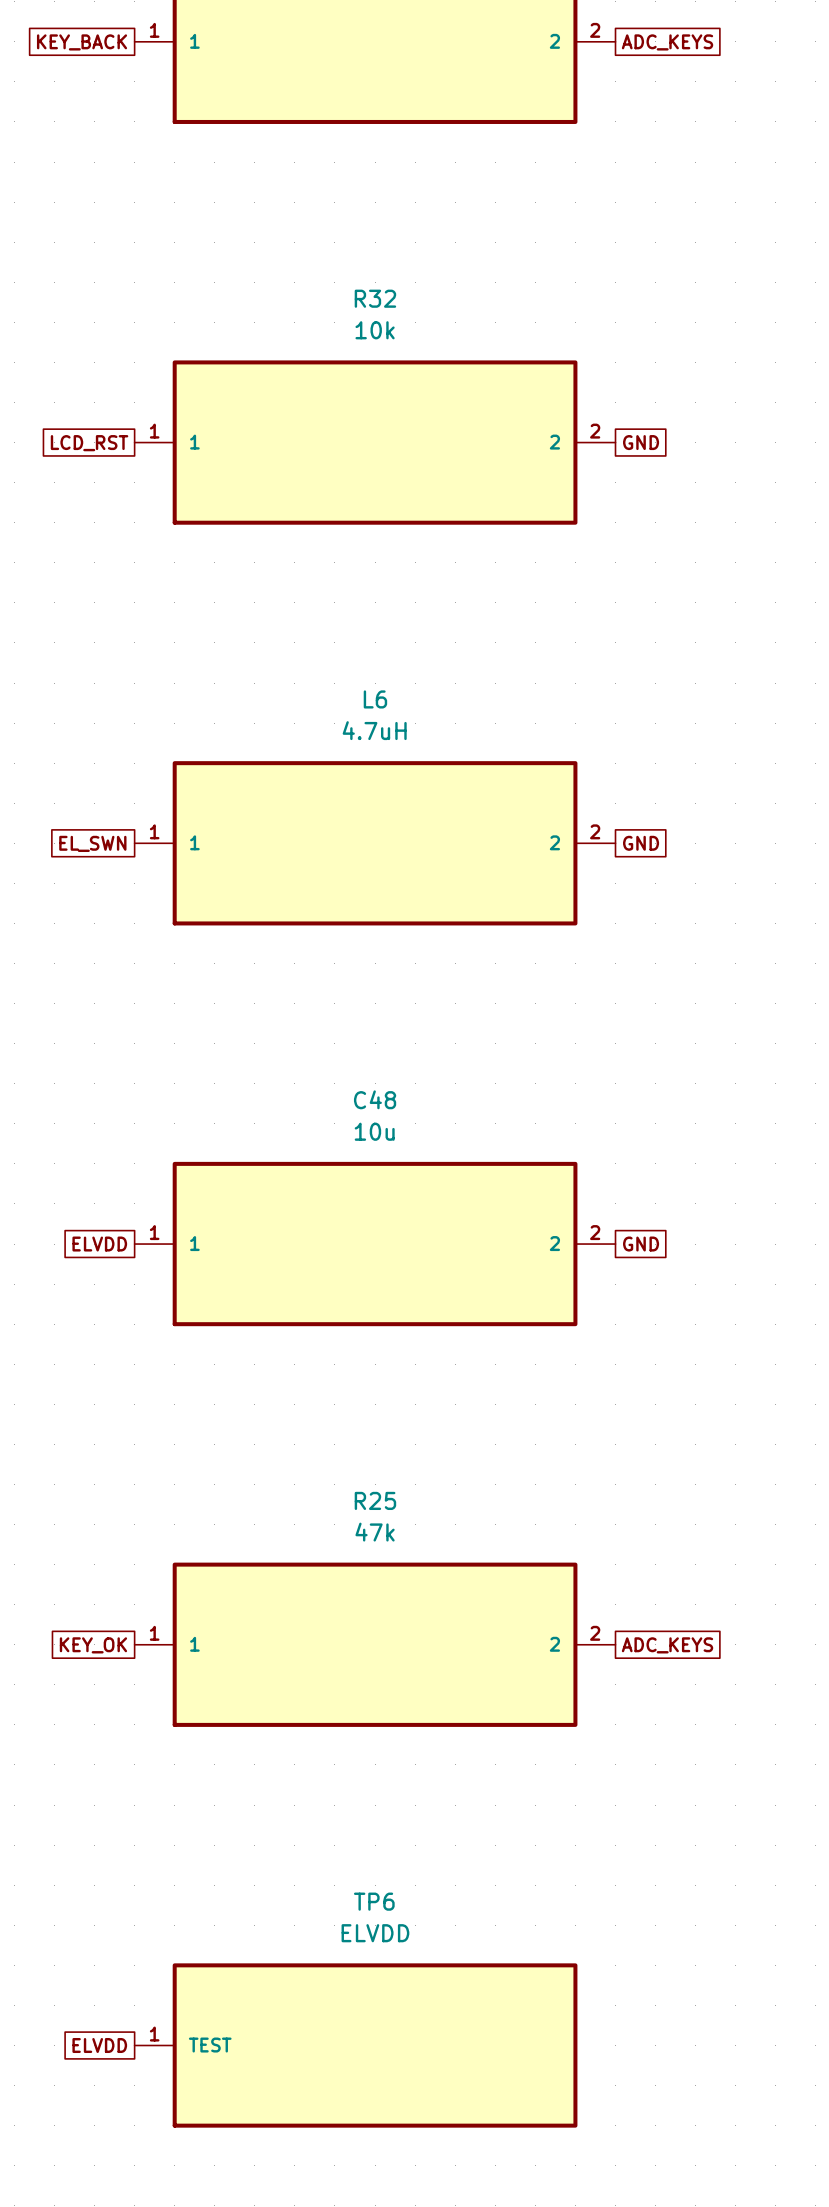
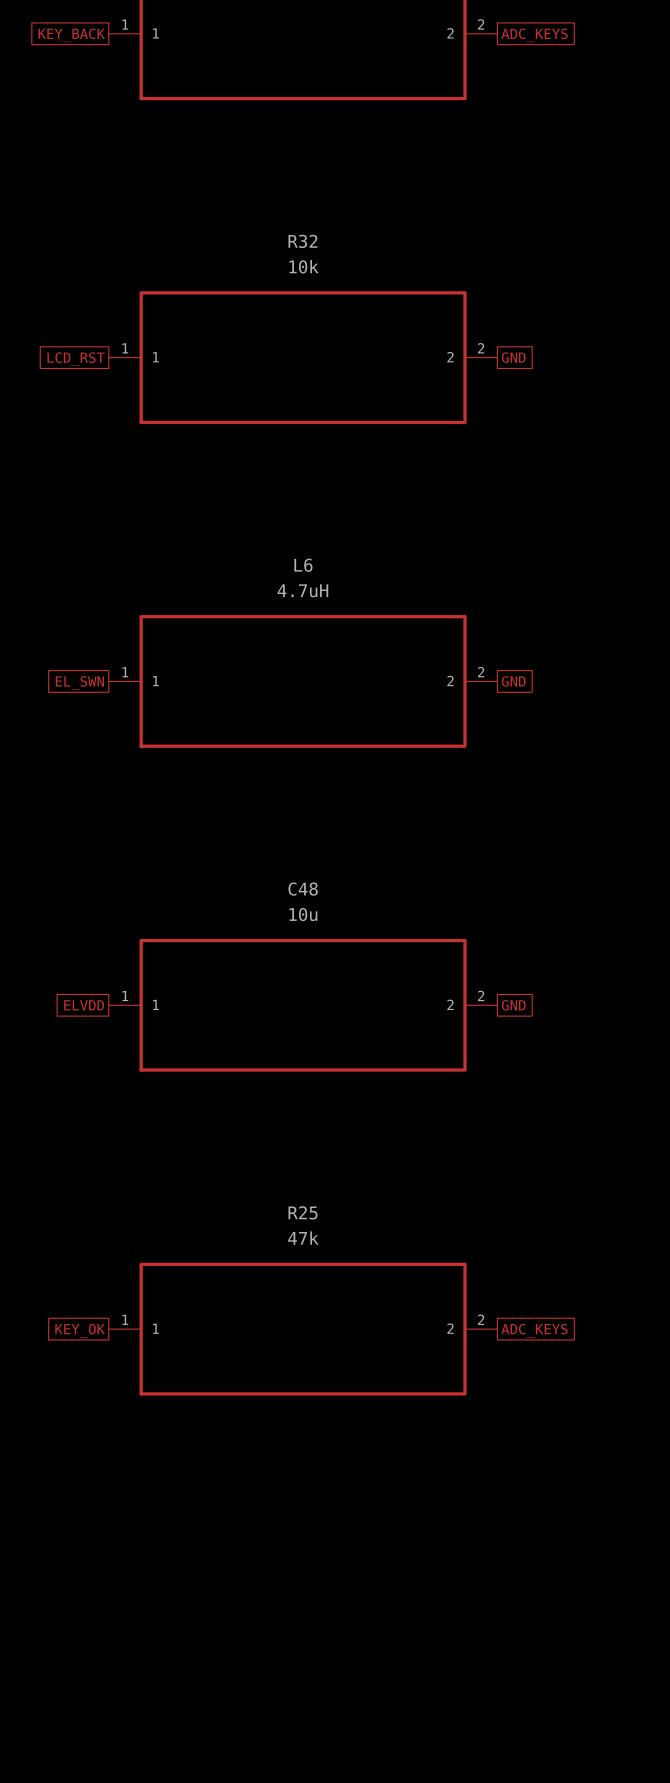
global label: ELVDD (99, 2045) -> none
TP6: ELVDD (356, 2045) -> none

